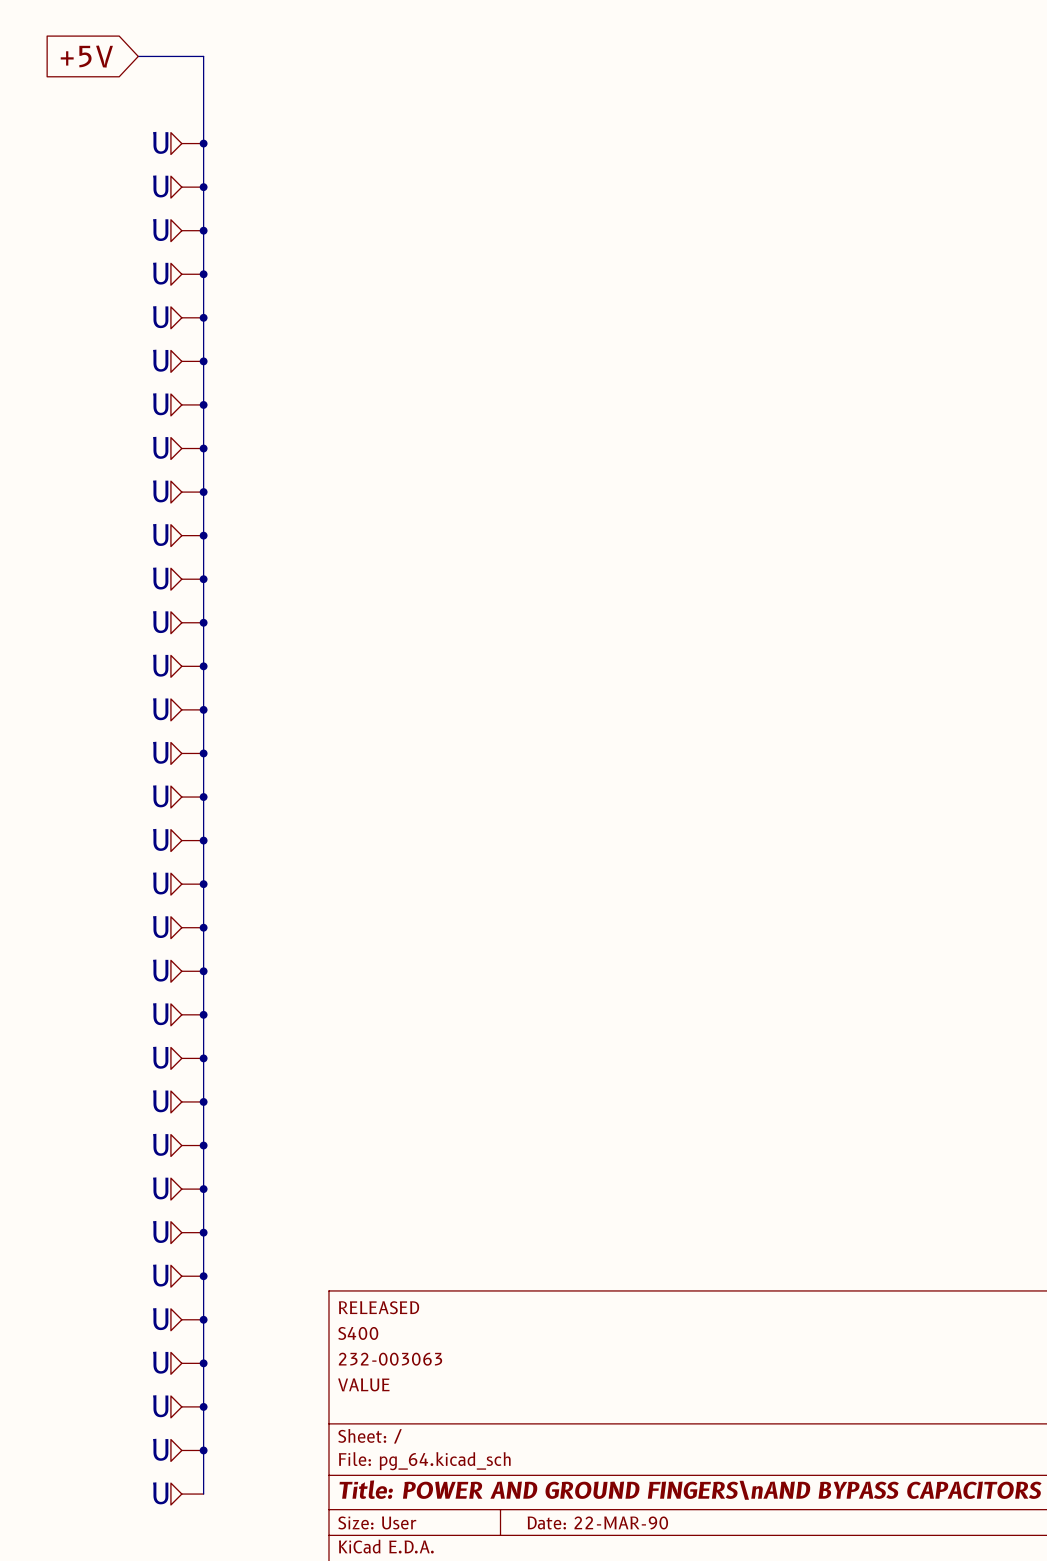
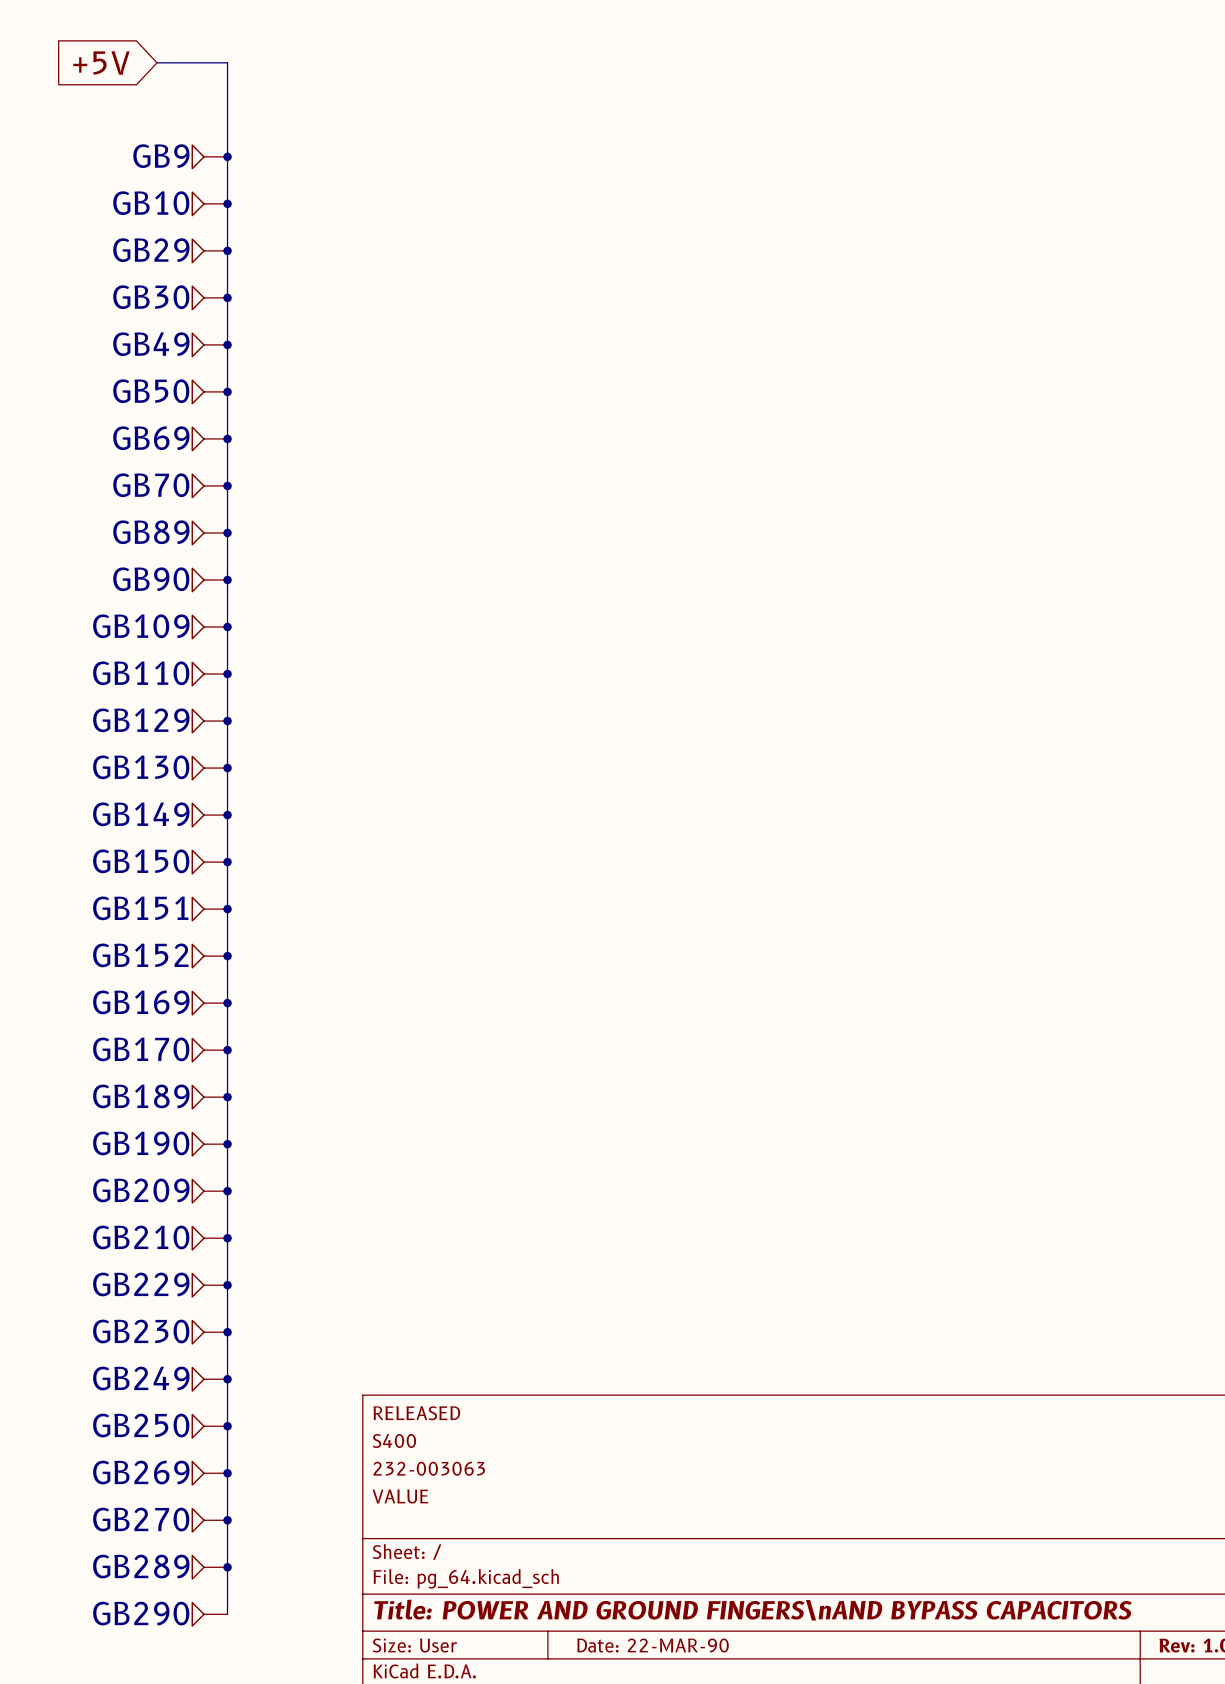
U name: U (160, 142) -> GB9 (161, 156)
U name: U (160, 186) -> GB10 (151, 203)
U name: U (160, 230) -> GB29 (151, 250)
U name: U (160, 273) -> GB30 (151, 297)
U name: U (160, 317) -> GB49 (151, 344)
U name: U (160, 360) -> GB50 (151, 391)
U name: U (160, 404) -> GB69 (151, 438)
U name: U (160, 447) -> GB70 (151, 485)
U name: U (160, 491) -> GB89 (151, 532)
U name: U (160, 534) -> GB90 (151, 579)
U name: U (160, 578) -> GB109 (141, 626)
U name: U (160, 622) -> GB110 (141, 673)
U name: U (160, 665) -> GB129 (141, 720)
U name: U (160, 709) -> GB130 (141, 767)
U name: U (160, 752) -> GB149 (141, 814)
U name: U (160, 796) -> GB150 (141, 861)
U name: U (160, 839) -> GB151 (140, 908)
U name: U (160, 883) -> GB152 (140, 955)
U name: U (160, 927) -> GB169 (141, 1002)
U name: U (160, 970) -> GB170 (141, 1049)
U name: U (160, 1014) -> GB189 (141, 1096)
U name: U (160, 1057) -> GB190 (141, 1143)
U name: U (160, 1101) -> GB209 (141, 1190)
U name: U (160, 1144) -> GB210 (141, 1237)
U name: U (160, 1188) -> GB229 (141, 1284)
U name: U (160, 1231) -> GB230 (141, 1331)
U name: U (160, 1275) -> GB249 (141, 1378)
U name: U (160, 1319) -> GB250 (141, 1425)
U name: U (160, 1362) -> GB269 (141, 1472)
U name: U (160, 1406) -> GB270 (141, 1519)
U name: U (160, 1449) -> GB289 (141, 1566)
U name: U (160, 1493) -> GB290 (141, 1613)

